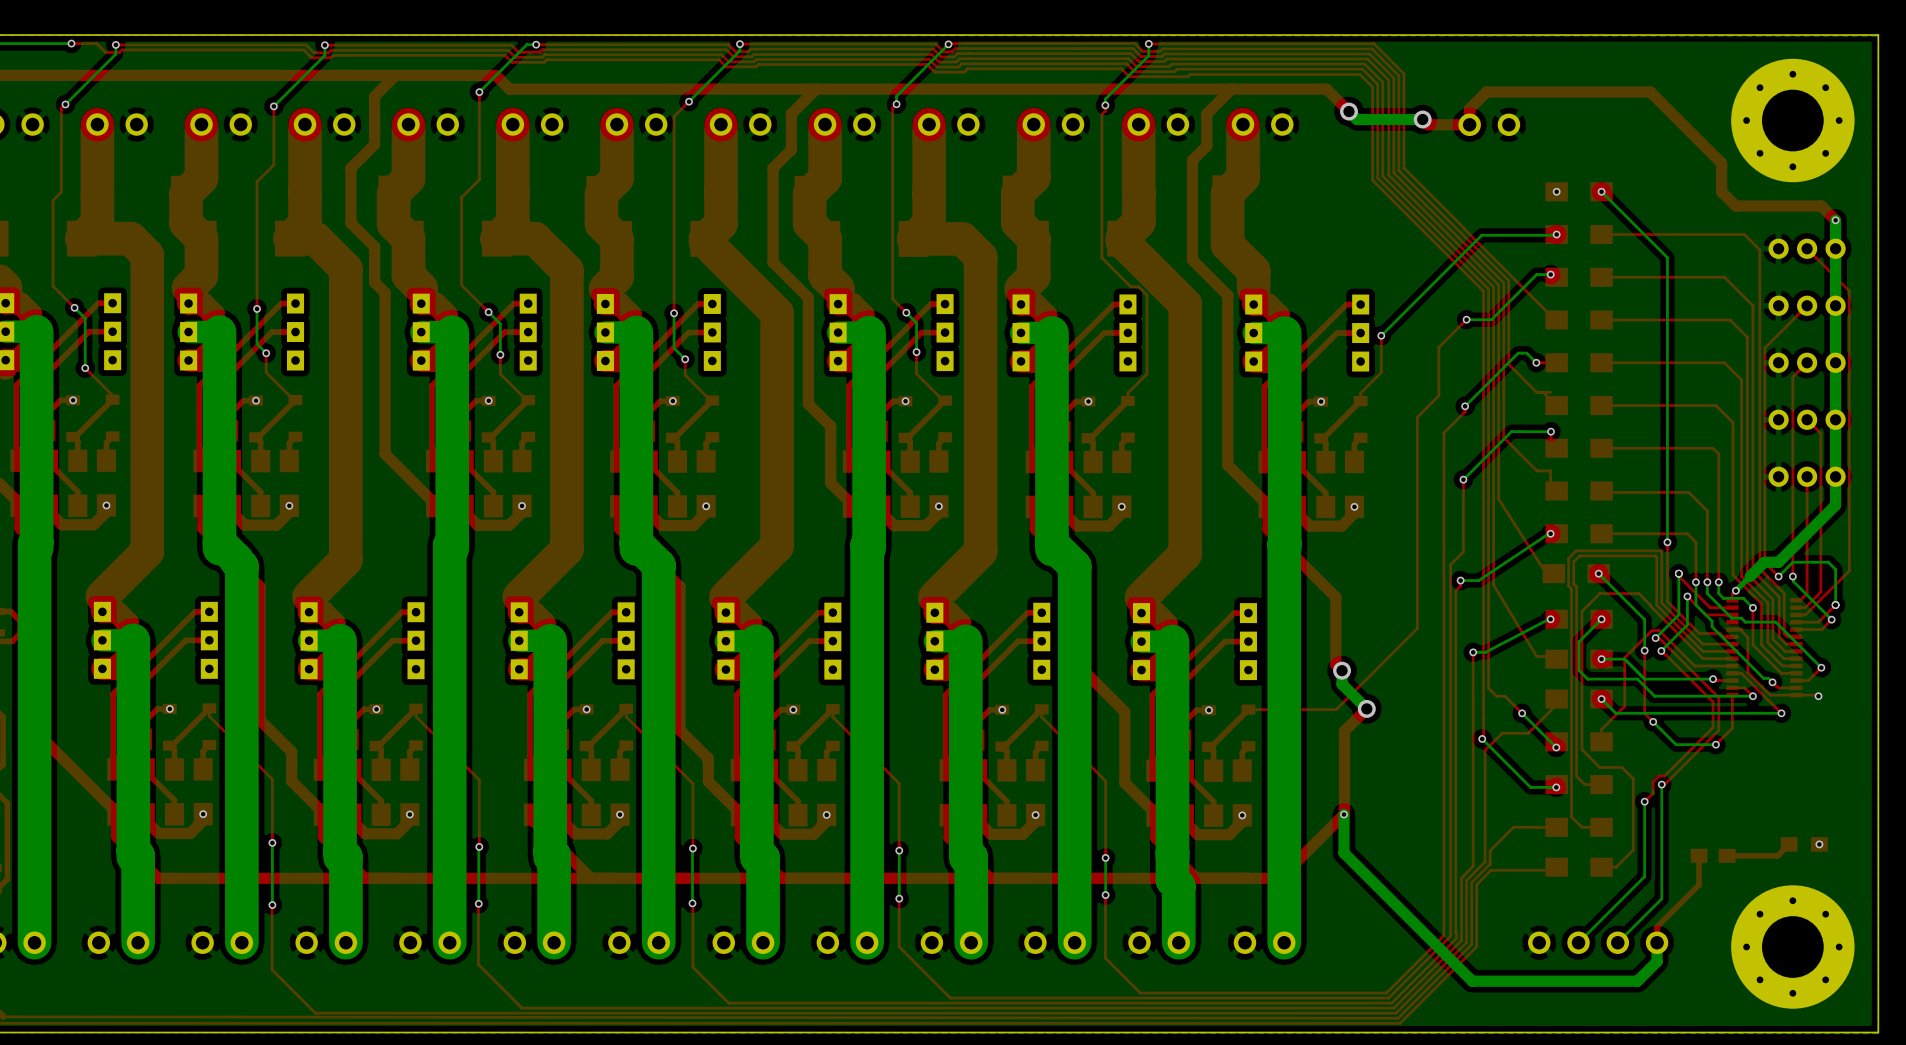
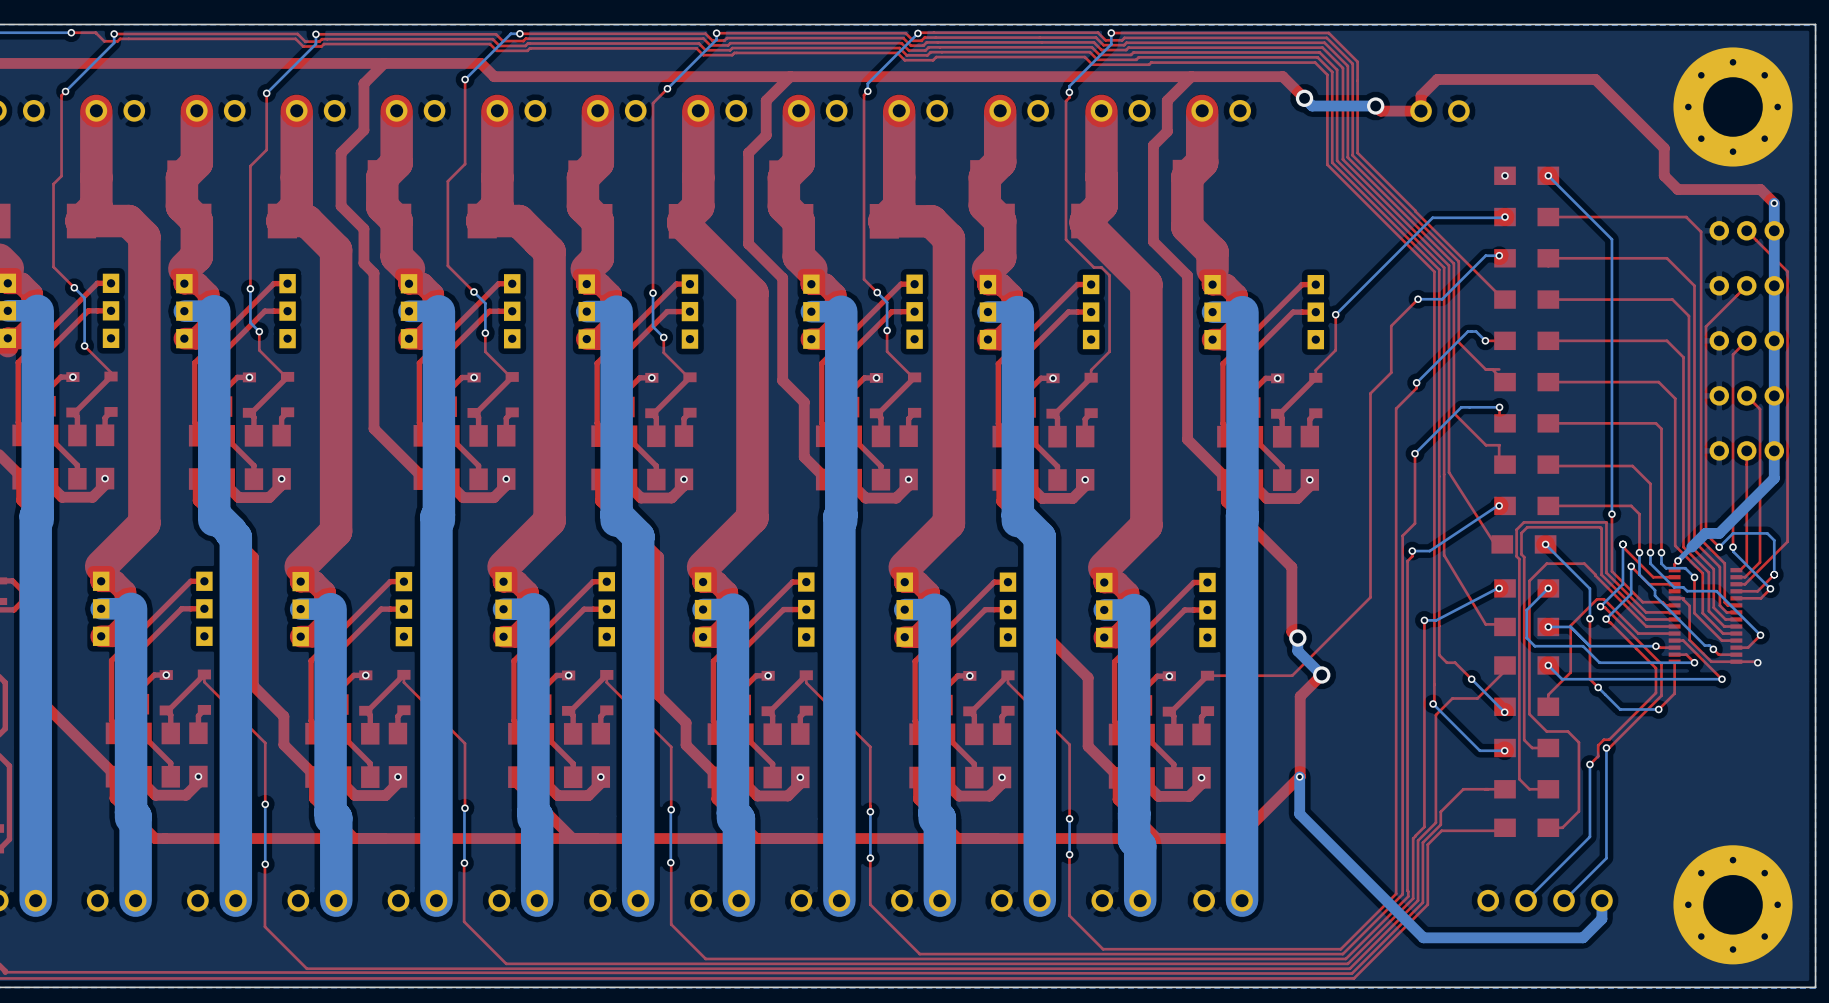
top track: (1789, 844) (1777, 855) (1727, 855) -> none
part: (1804, 844) -> none
via: (1819, 844) -> none
top track: (1699, 855) (1699, 884) (1657, 926) (1657, 942) -> none
part: (1713, 855) -> none

